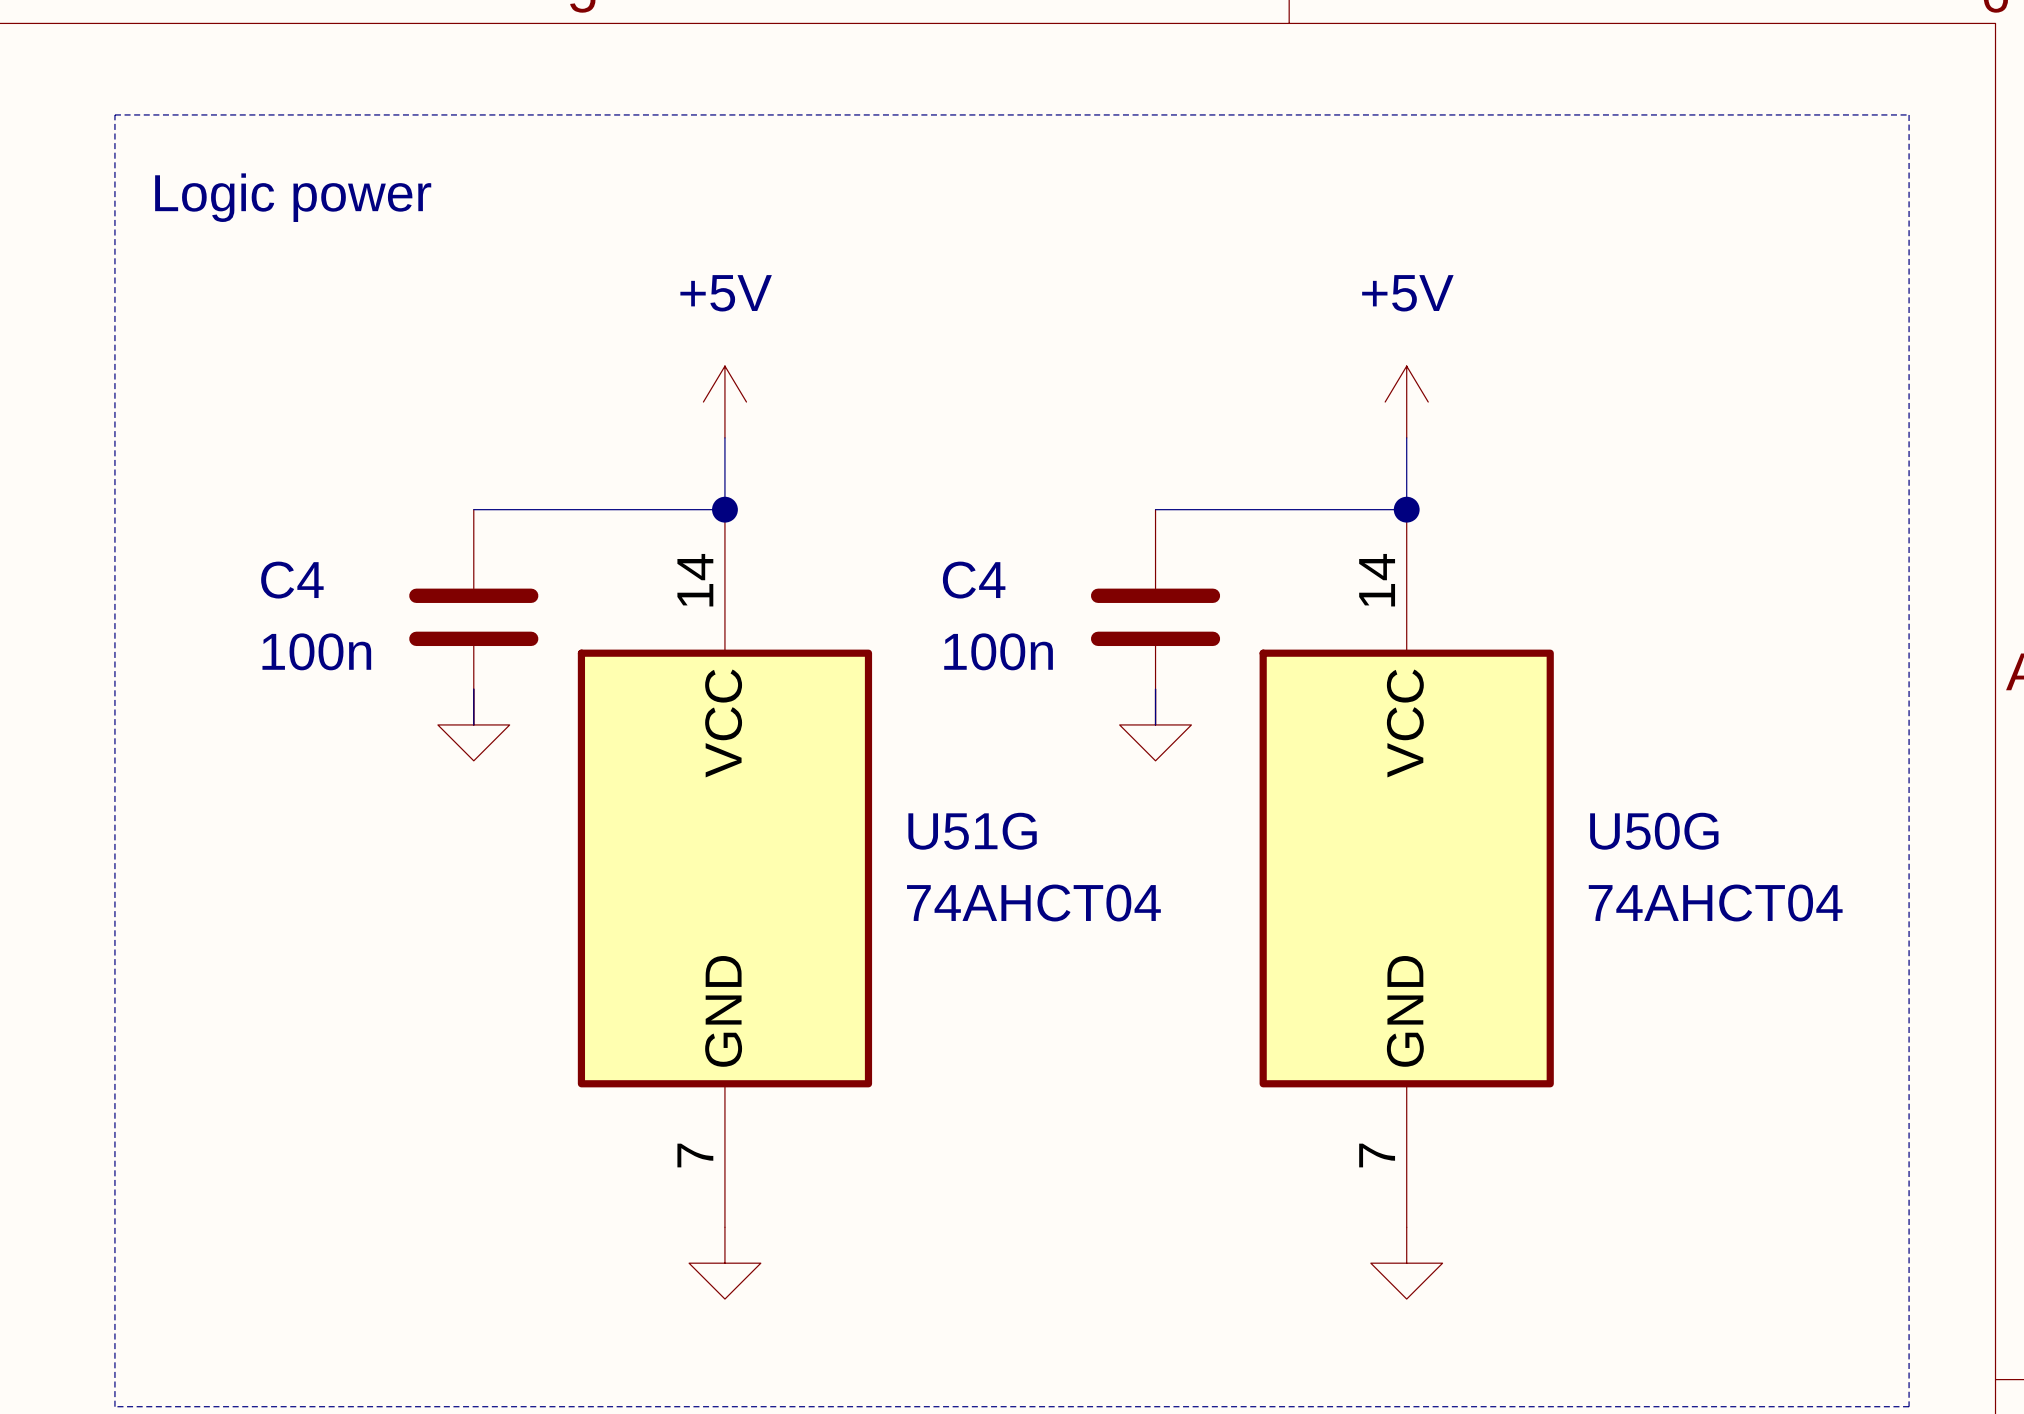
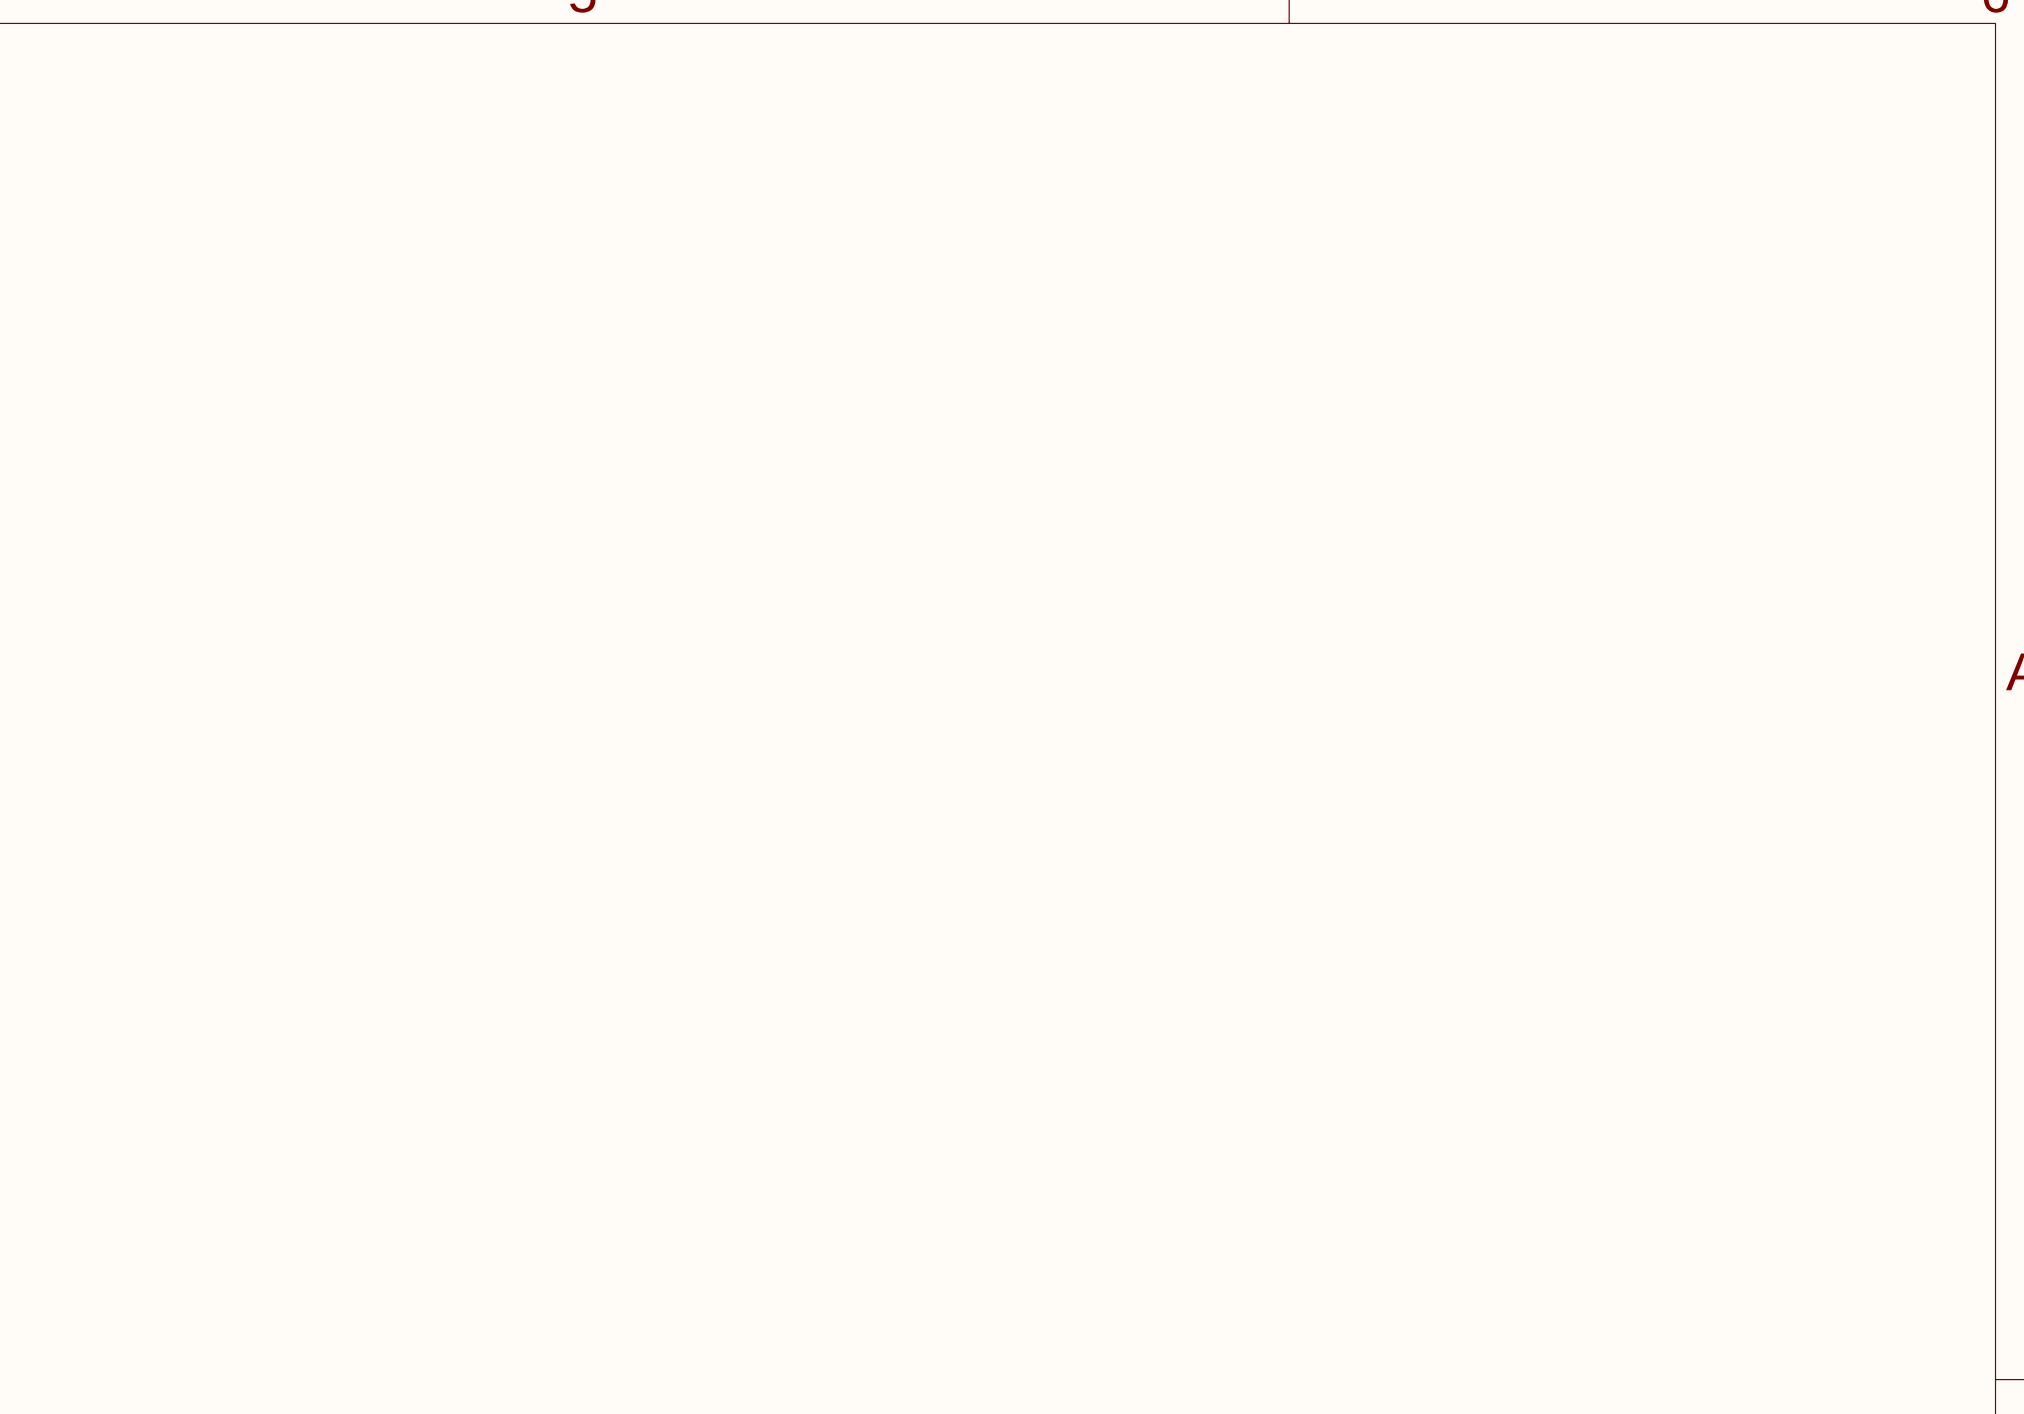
line: (114, 114) (1909, 114) (1909, 1406) (114, 1406) (114, 114) -> none
text: Logic power (293, 197) -> none
power symbol: +5V (724, 402) -> none
power symbol: +5V (1406, 402) -> none
wire: (724, 437) (724, 509) (473, 509) -> none
wire: (1406, 437) (1406, 509) (1155, 509) -> none
junction: (724, 509) -> none
junction: (1406, 509) -> none
C4: 100n (473, 617) -> none
C4: 100n (1155, 617) -> none
wire: (473, 689) (473, 724) -> none
wire: (1155, 689) (1155, 724) -> none
power symbol: (473, 724) -> none
power symbol: (1155, 724) -> none
U51G: 74AHCT04 (724, 868) -> none
U50G: 74AHCT04 (1406, 868) -> none
power symbol: (724, 1263) -> none
power symbol: (1406, 1263) -> none

